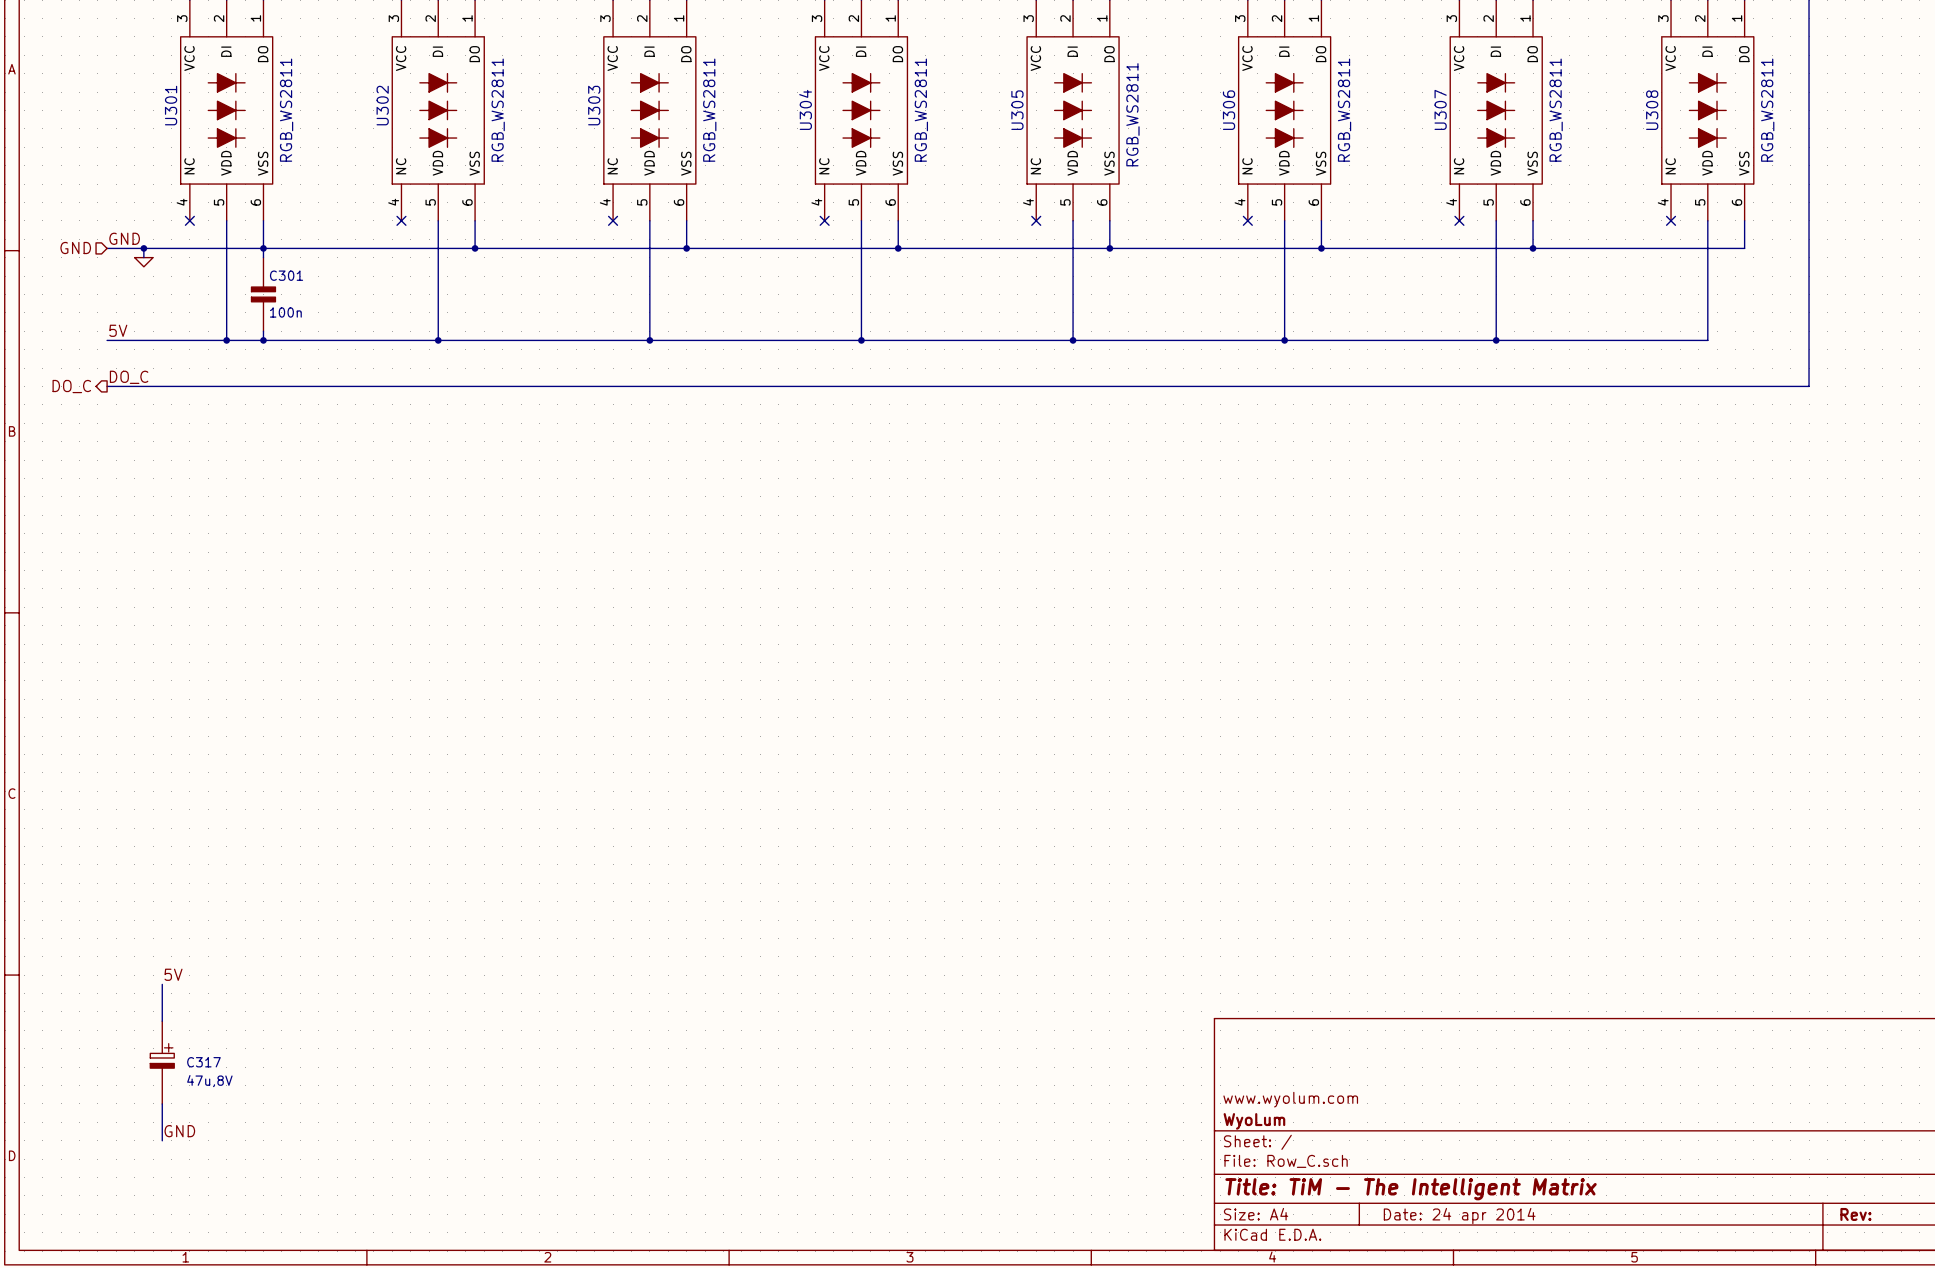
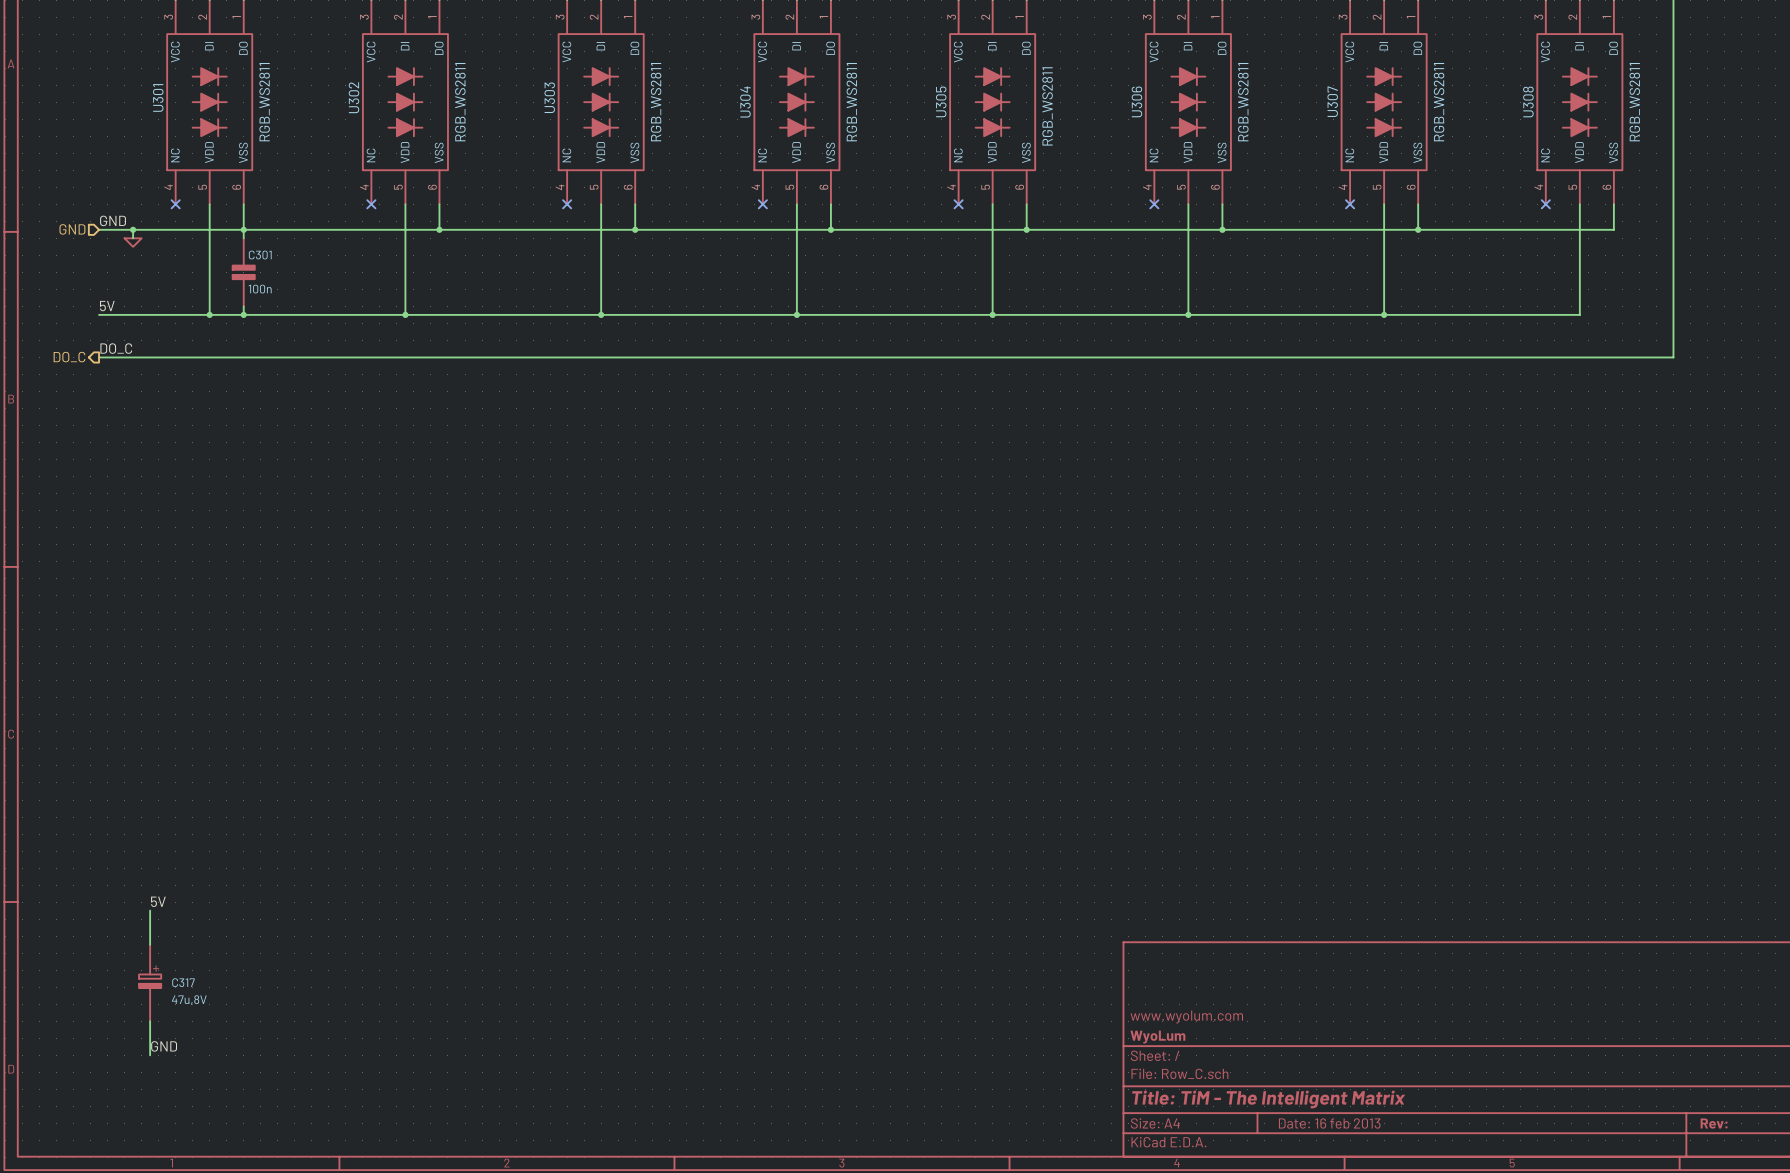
title block: Date: 24 apr 2014 (1459, 1216) -> Date: 16 feb 2013 (1329, 1123)

